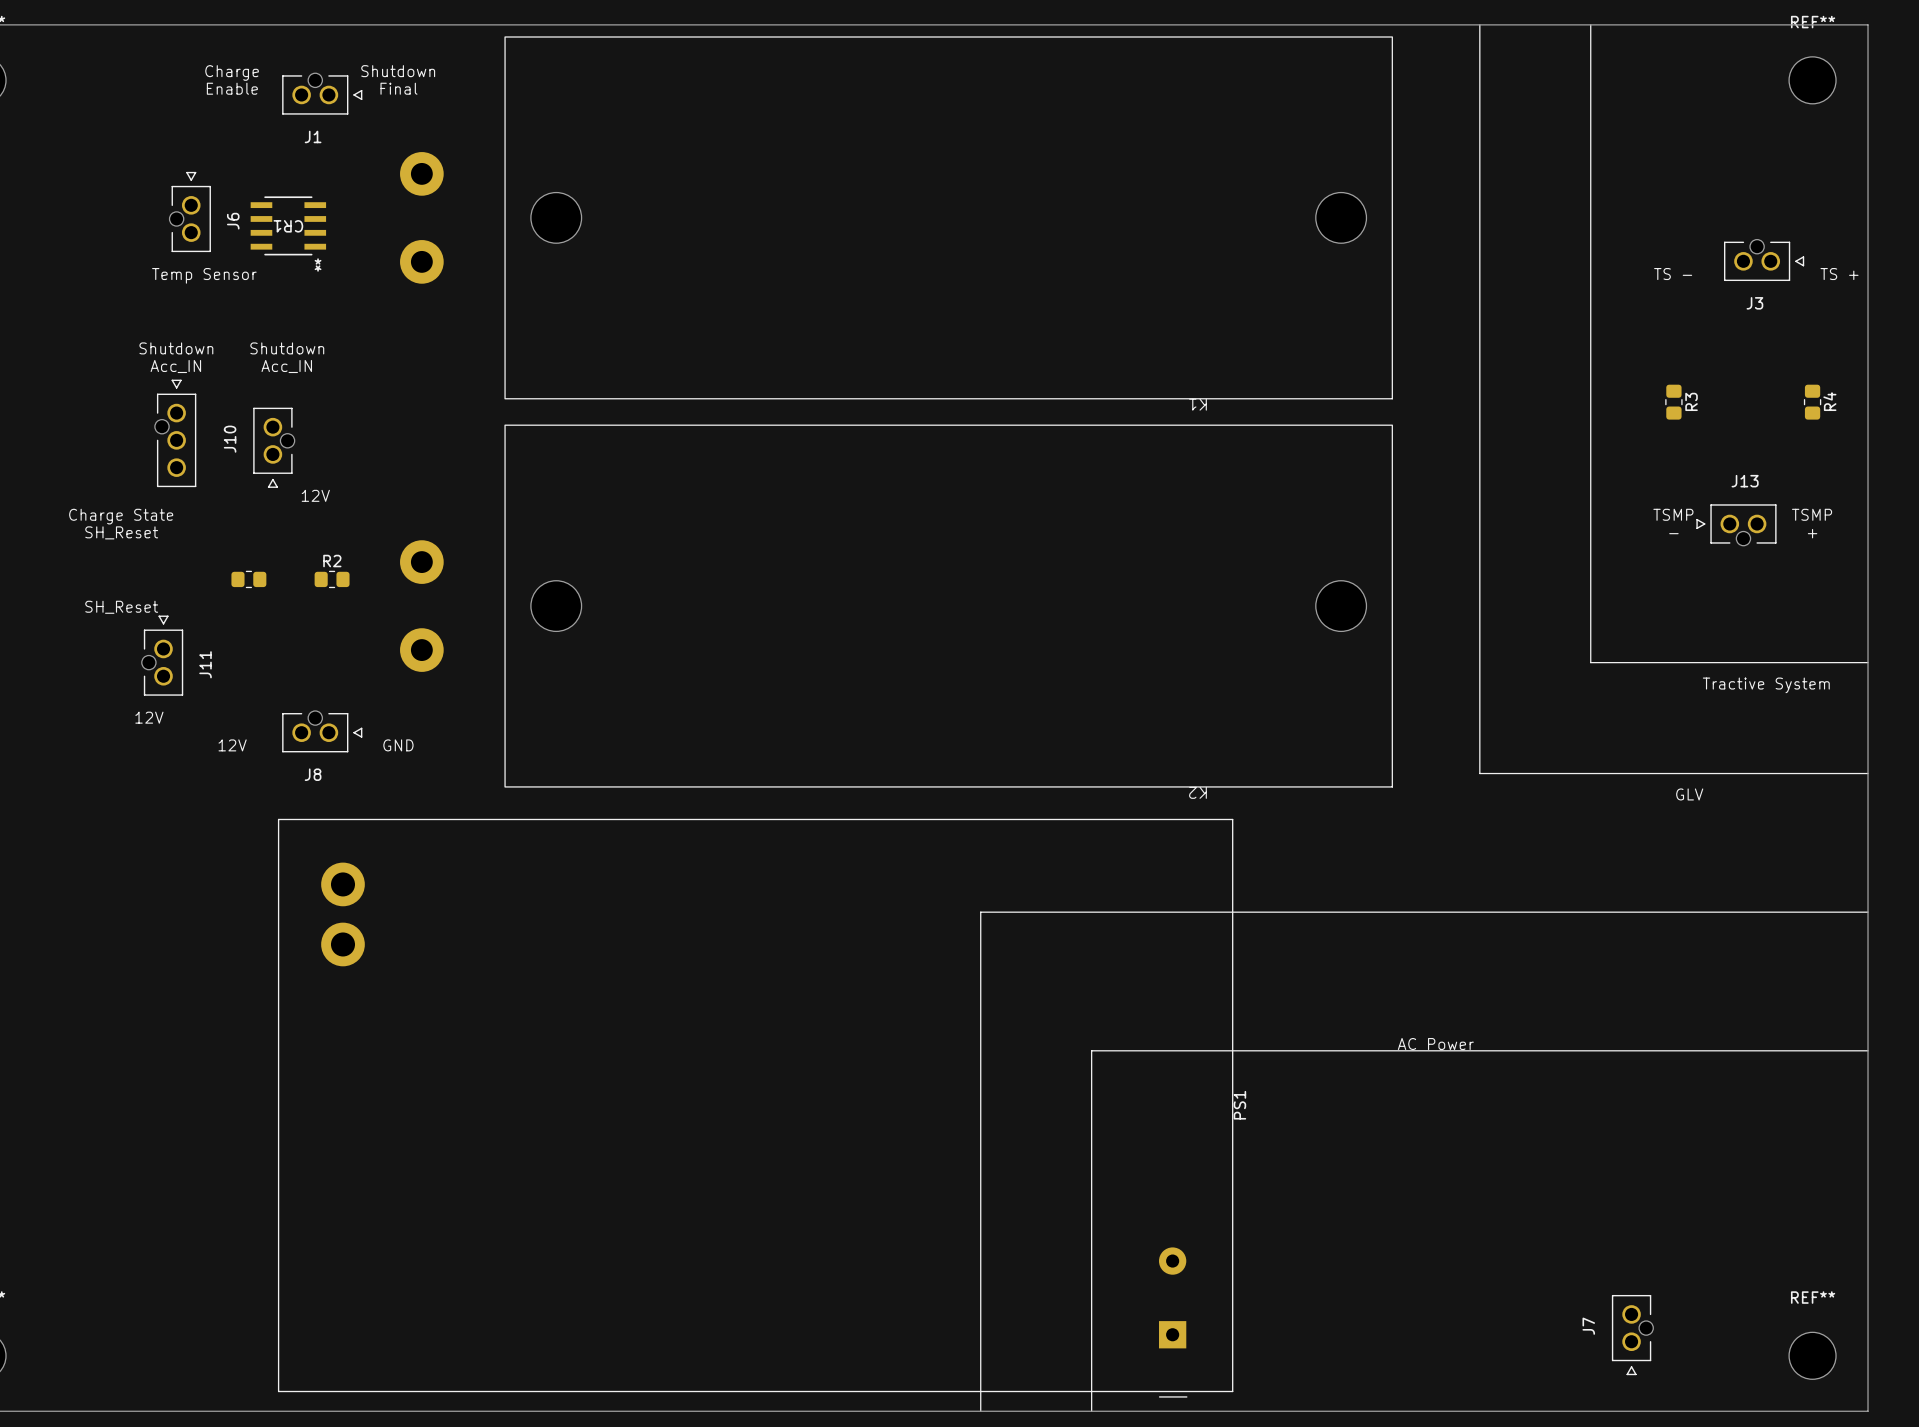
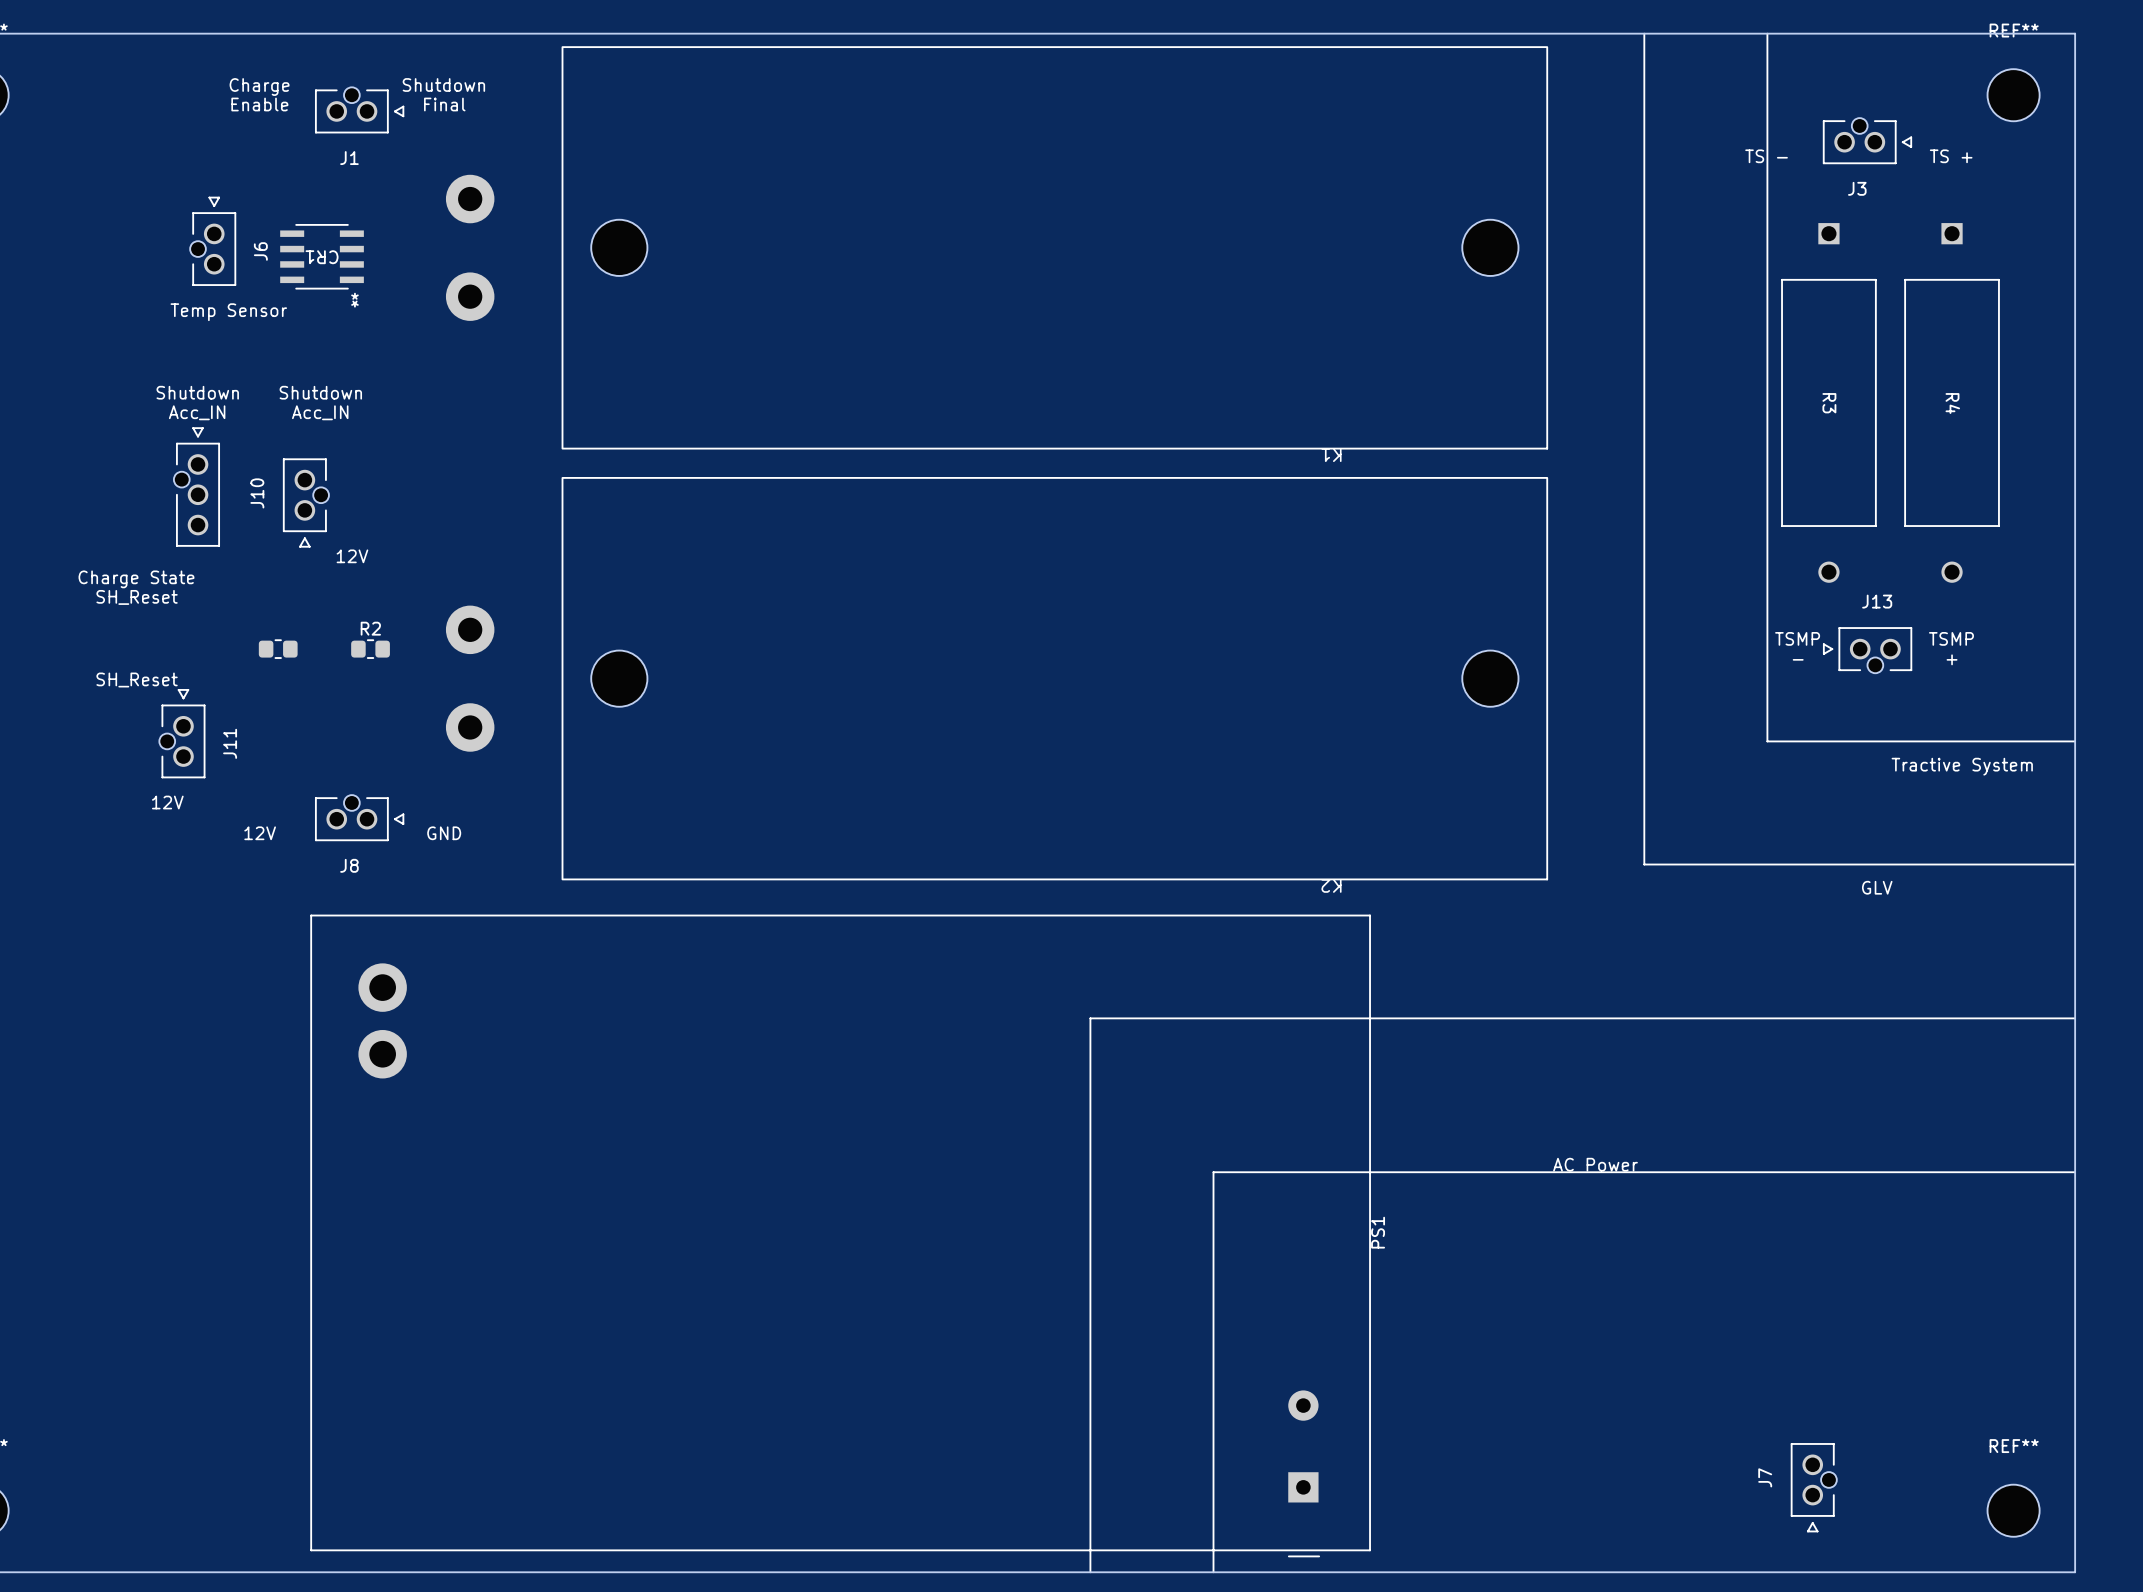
J3 position: (1764, 260) -> (1867, 141)
text position: TS - (1673, 274) -> TS - (1766, 156)
text position: TS + (1839, 274) -> TS + (1951, 156)
R3 footprint: [1665, 384, 1683, 420] -> [1781, 223, 1877, 583]
R4 footprint: [1803, 384, 1822, 420] -> [1904, 223, 2000, 583]
text: TSMP (1673, 514) -> none
text: TSMP (1812, 514) -> none
J13 position: (1736, 525) -> (1867, 650)
text position: - (1673, 533) -> - (1798, 659)
text position: + (1812, 533) -> + (1952, 659)
text: none -> TSMP (1797, 638)
text: none -> TSMP (1951, 638)

